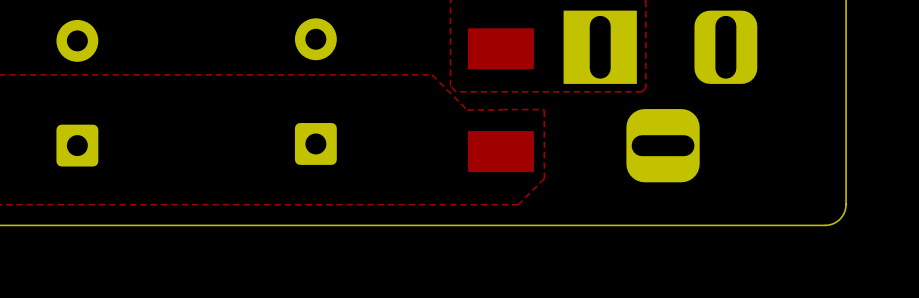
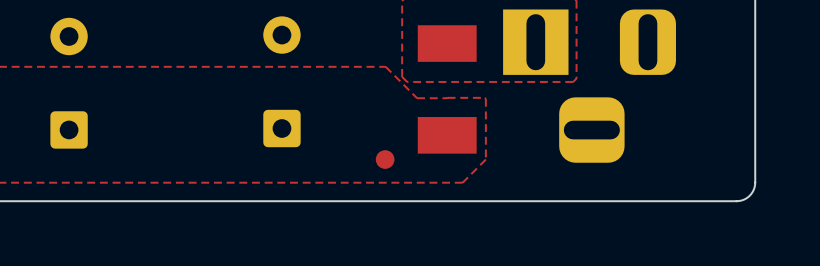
part: none -> (385, 159)

